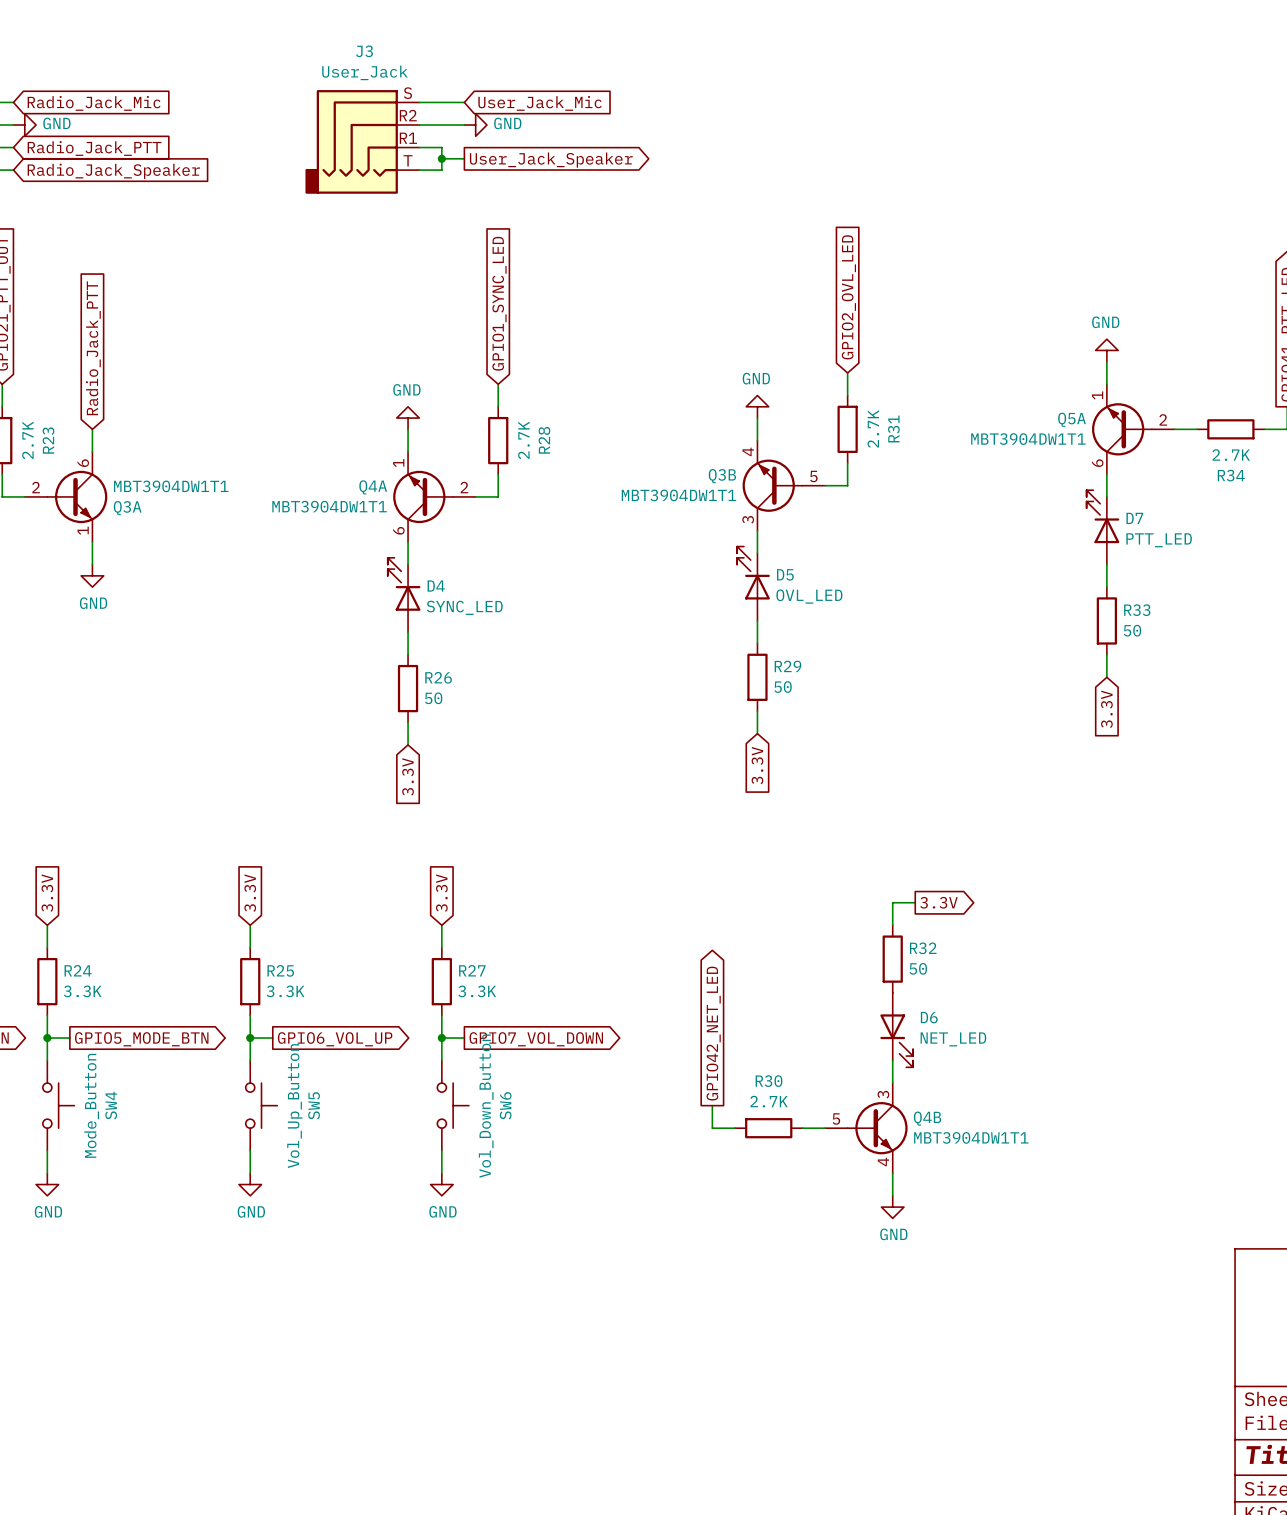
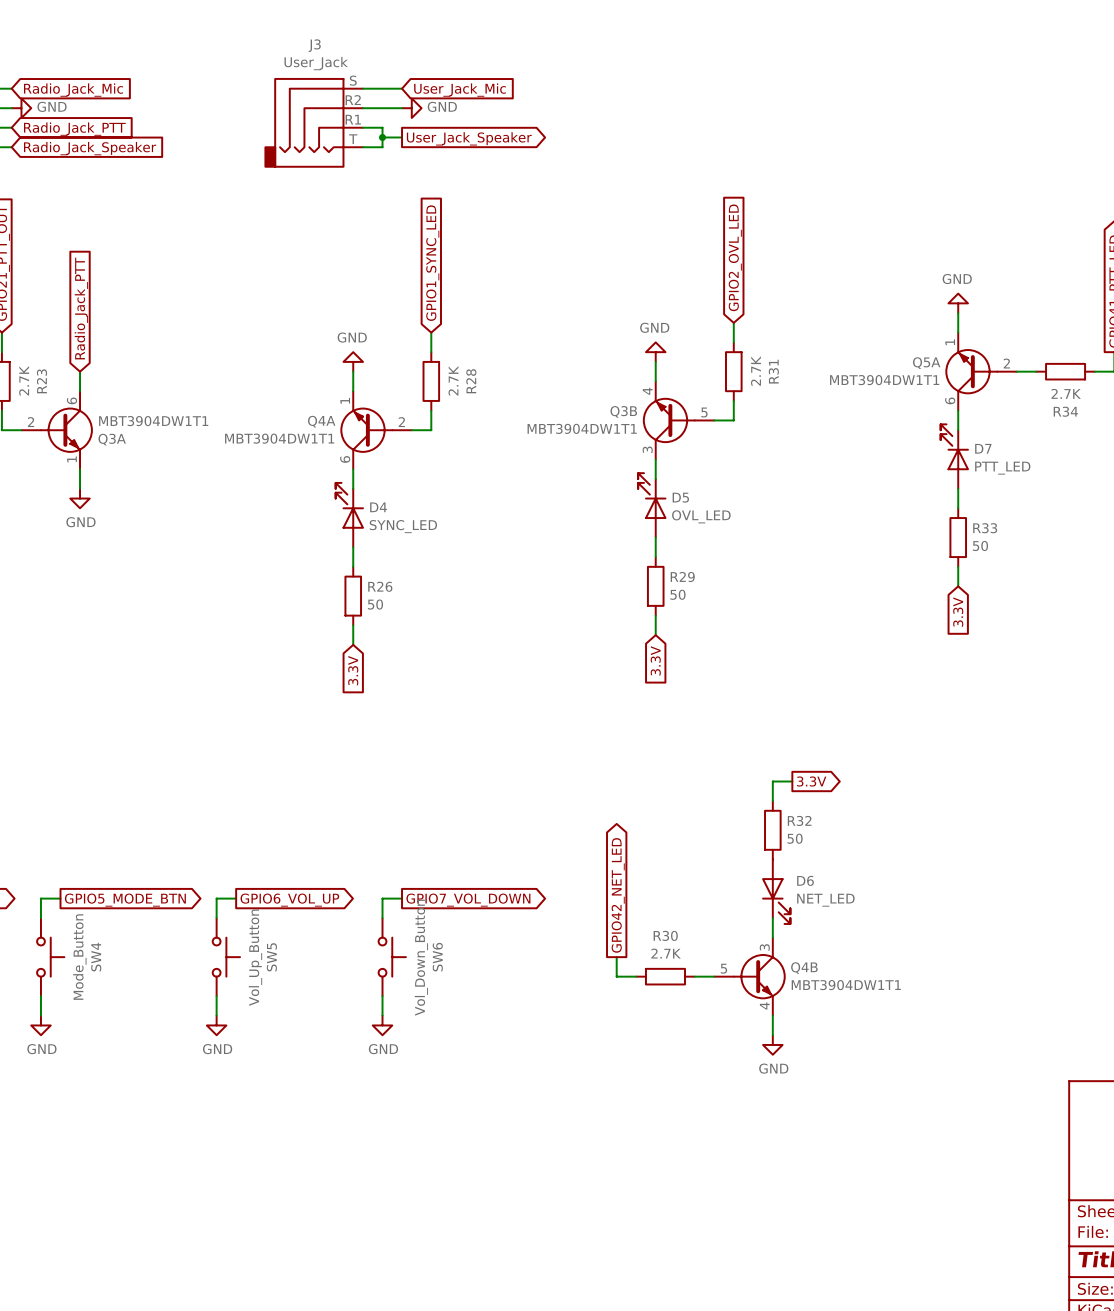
global label: 3.3V (47, 893) -> none
global label: 3.3V (250, 893) -> none
global label: 3.3V (441, 893) -> none
wire: (47, 925) (47, 947) -> none
wire: (250, 925) (250, 947) -> none
wire: (441, 925) (441, 947) -> none
R24: 3.3K (47, 981) -> none
R25: 3.3K (250, 981) -> none
R27: 3.3K (441, 981) -> none
wire: (47, 1015) (47, 1038) -> none
wire: (250, 1015) (250, 1038) -> none
wire: (441, 1015) (441, 1038) -> none
junction: (47, 1038) -> none
junction: (250, 1038) -> none
junction: (441, 1038) -> none

